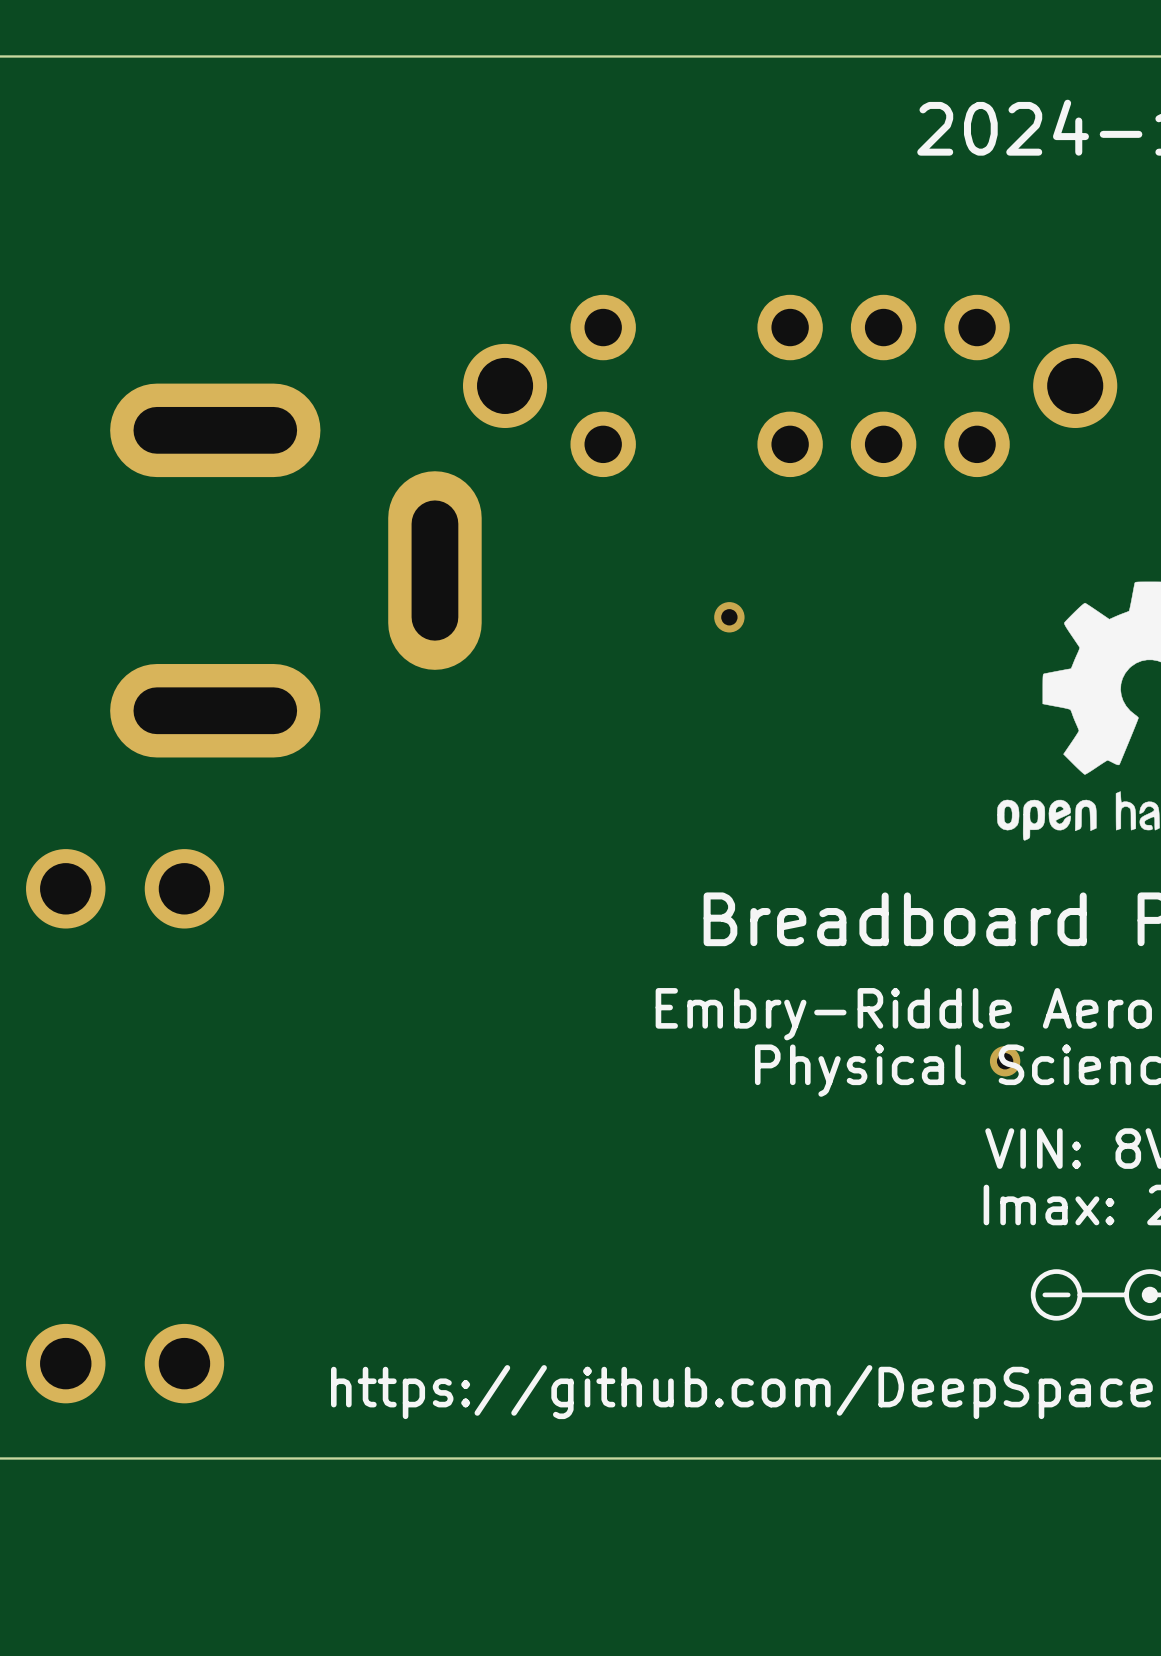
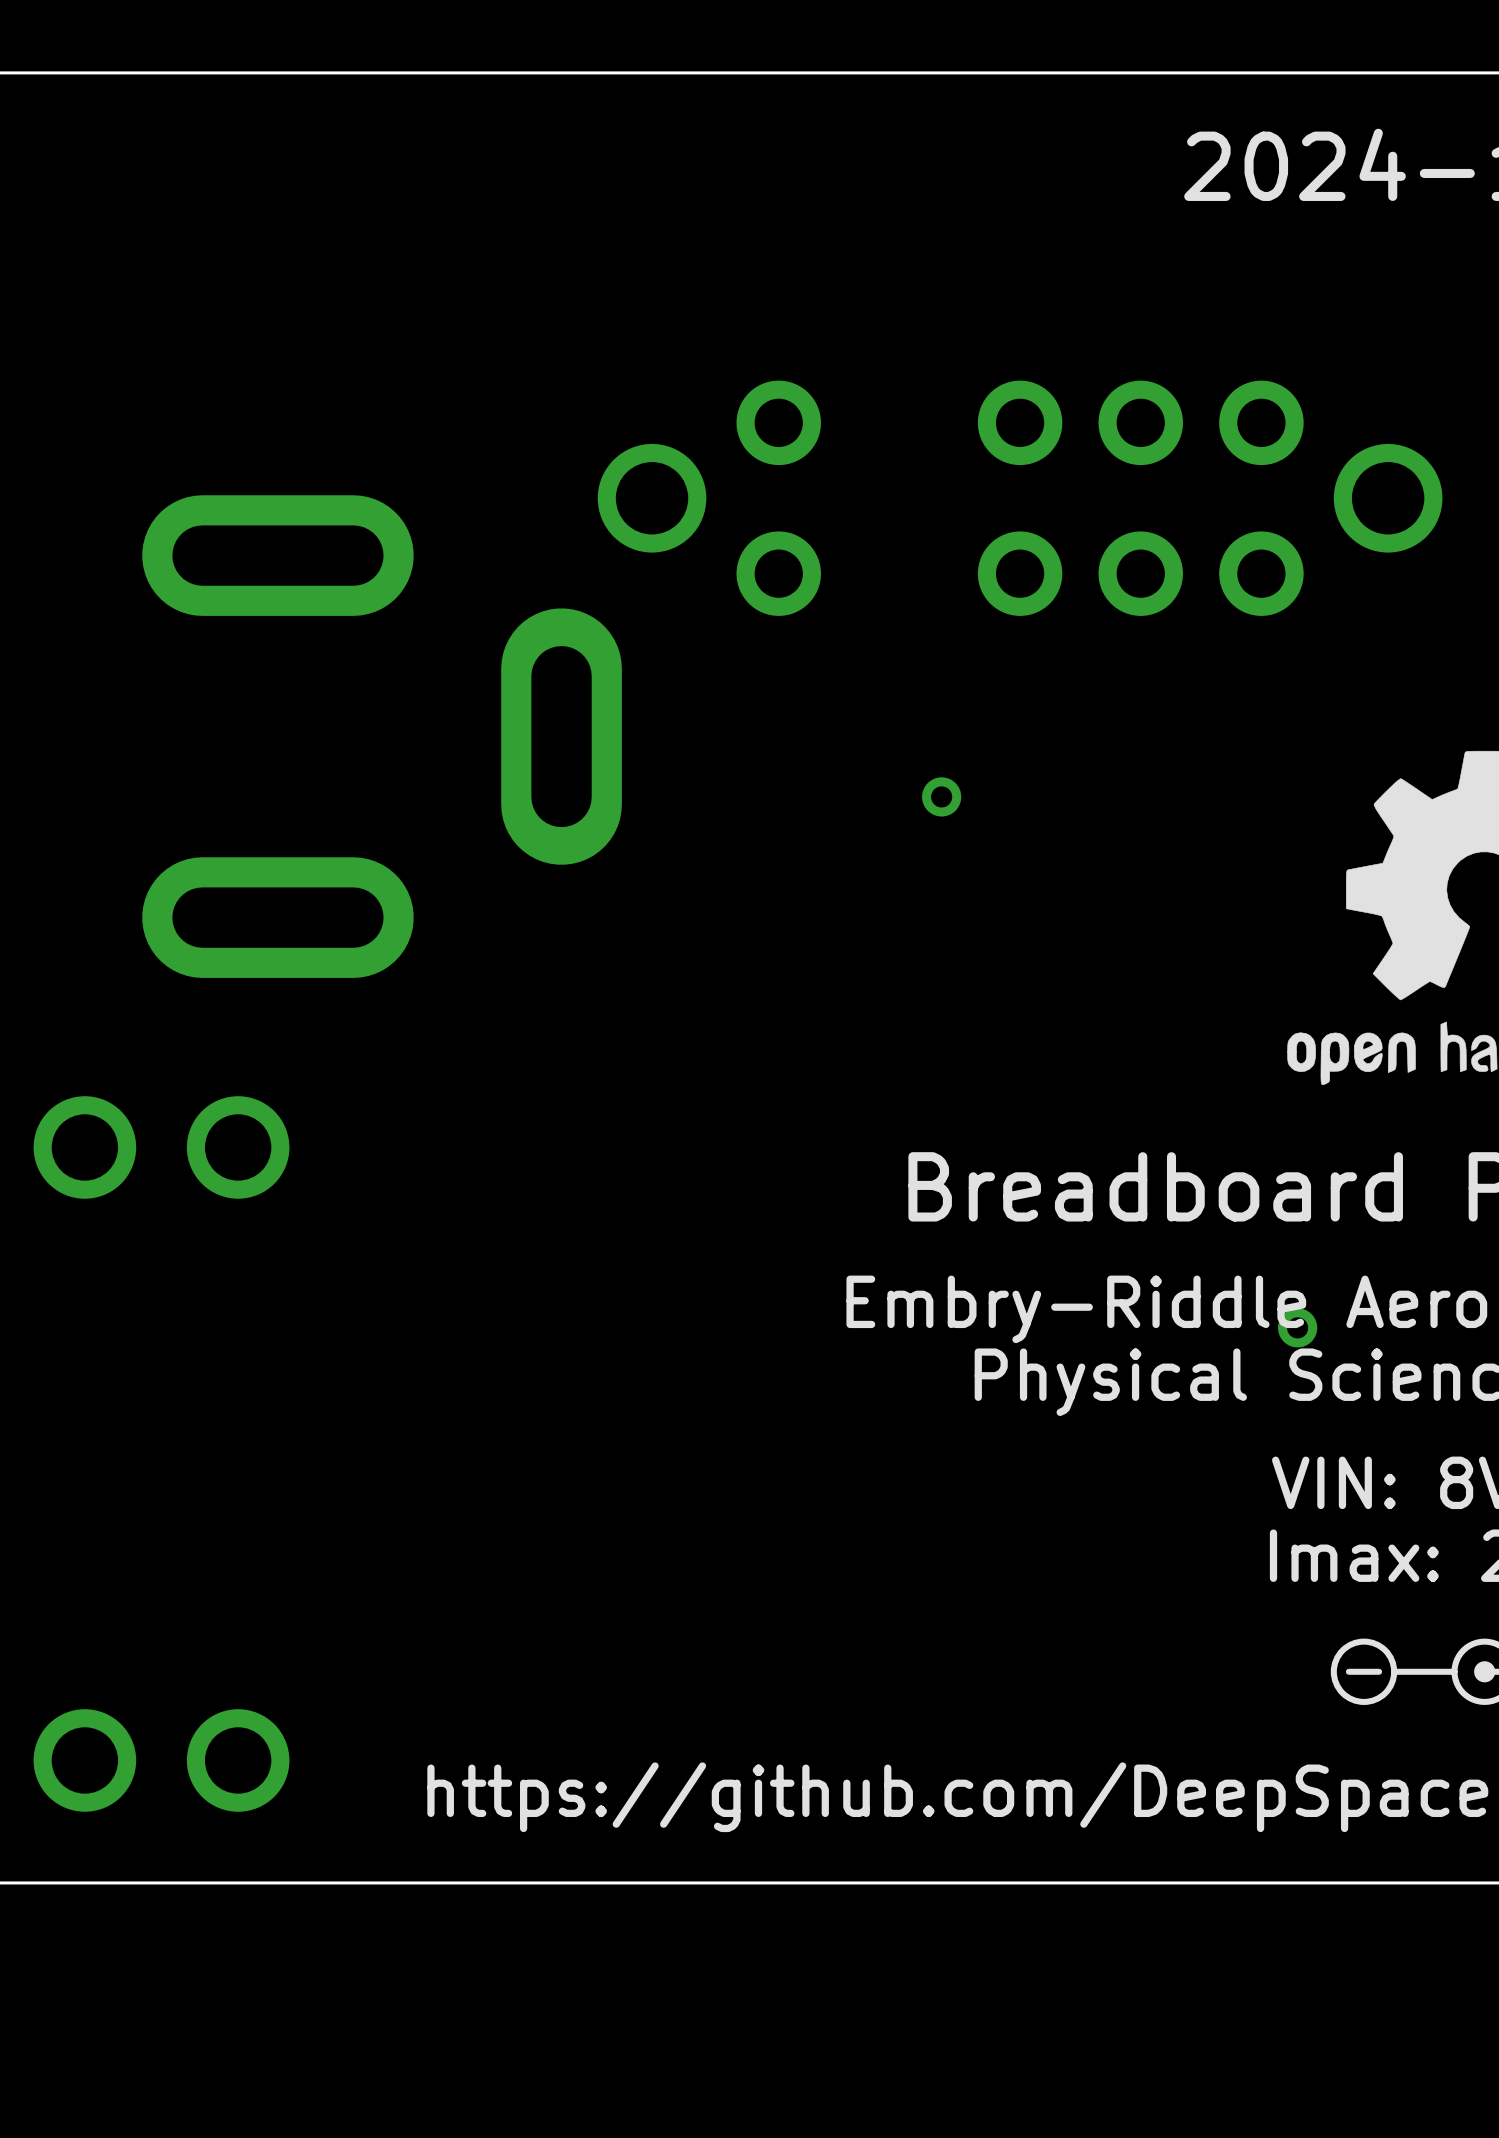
via position: (1005, 1061) -> (1297, 1327)

